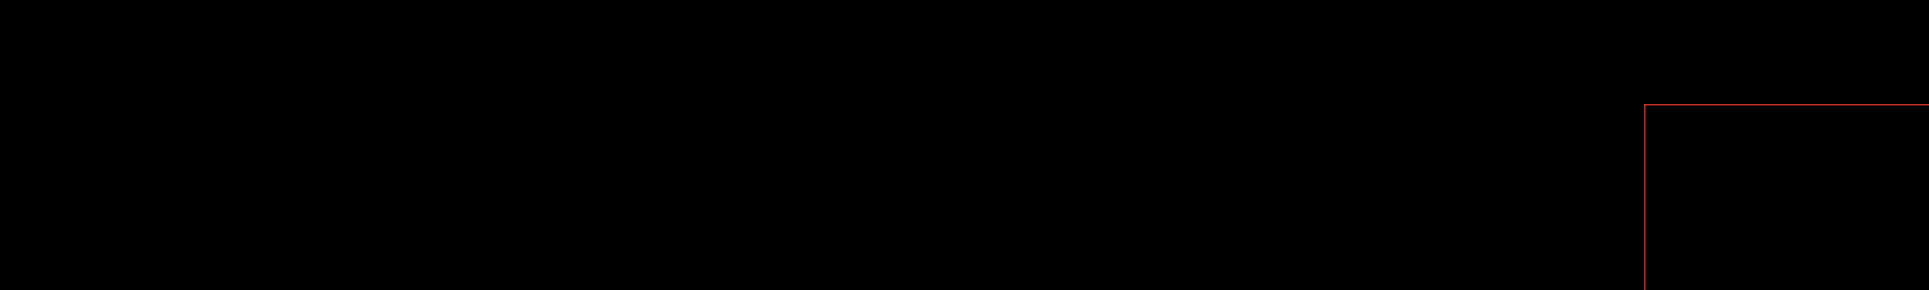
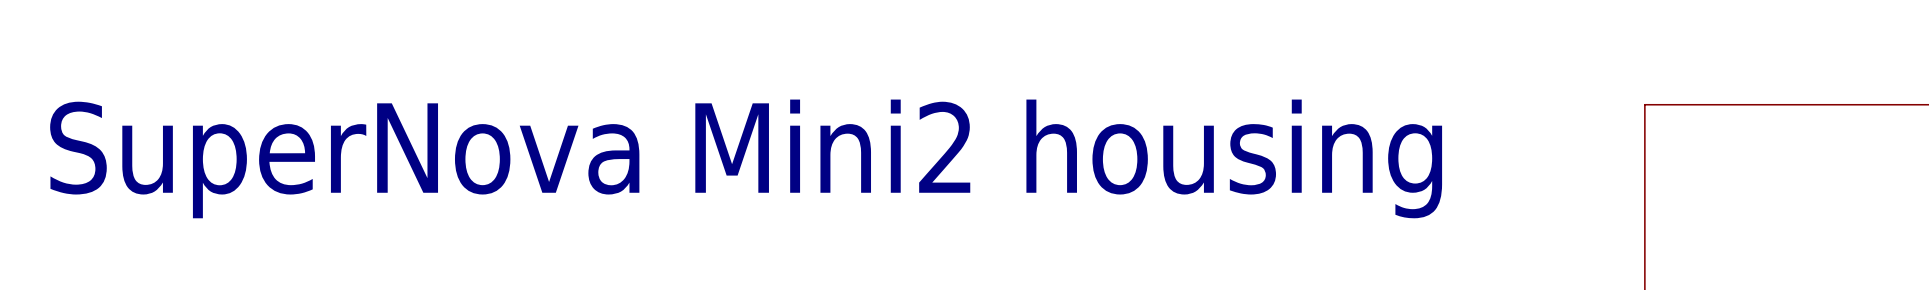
text: none -> SuperNova Mini2 housing (746, 158)

